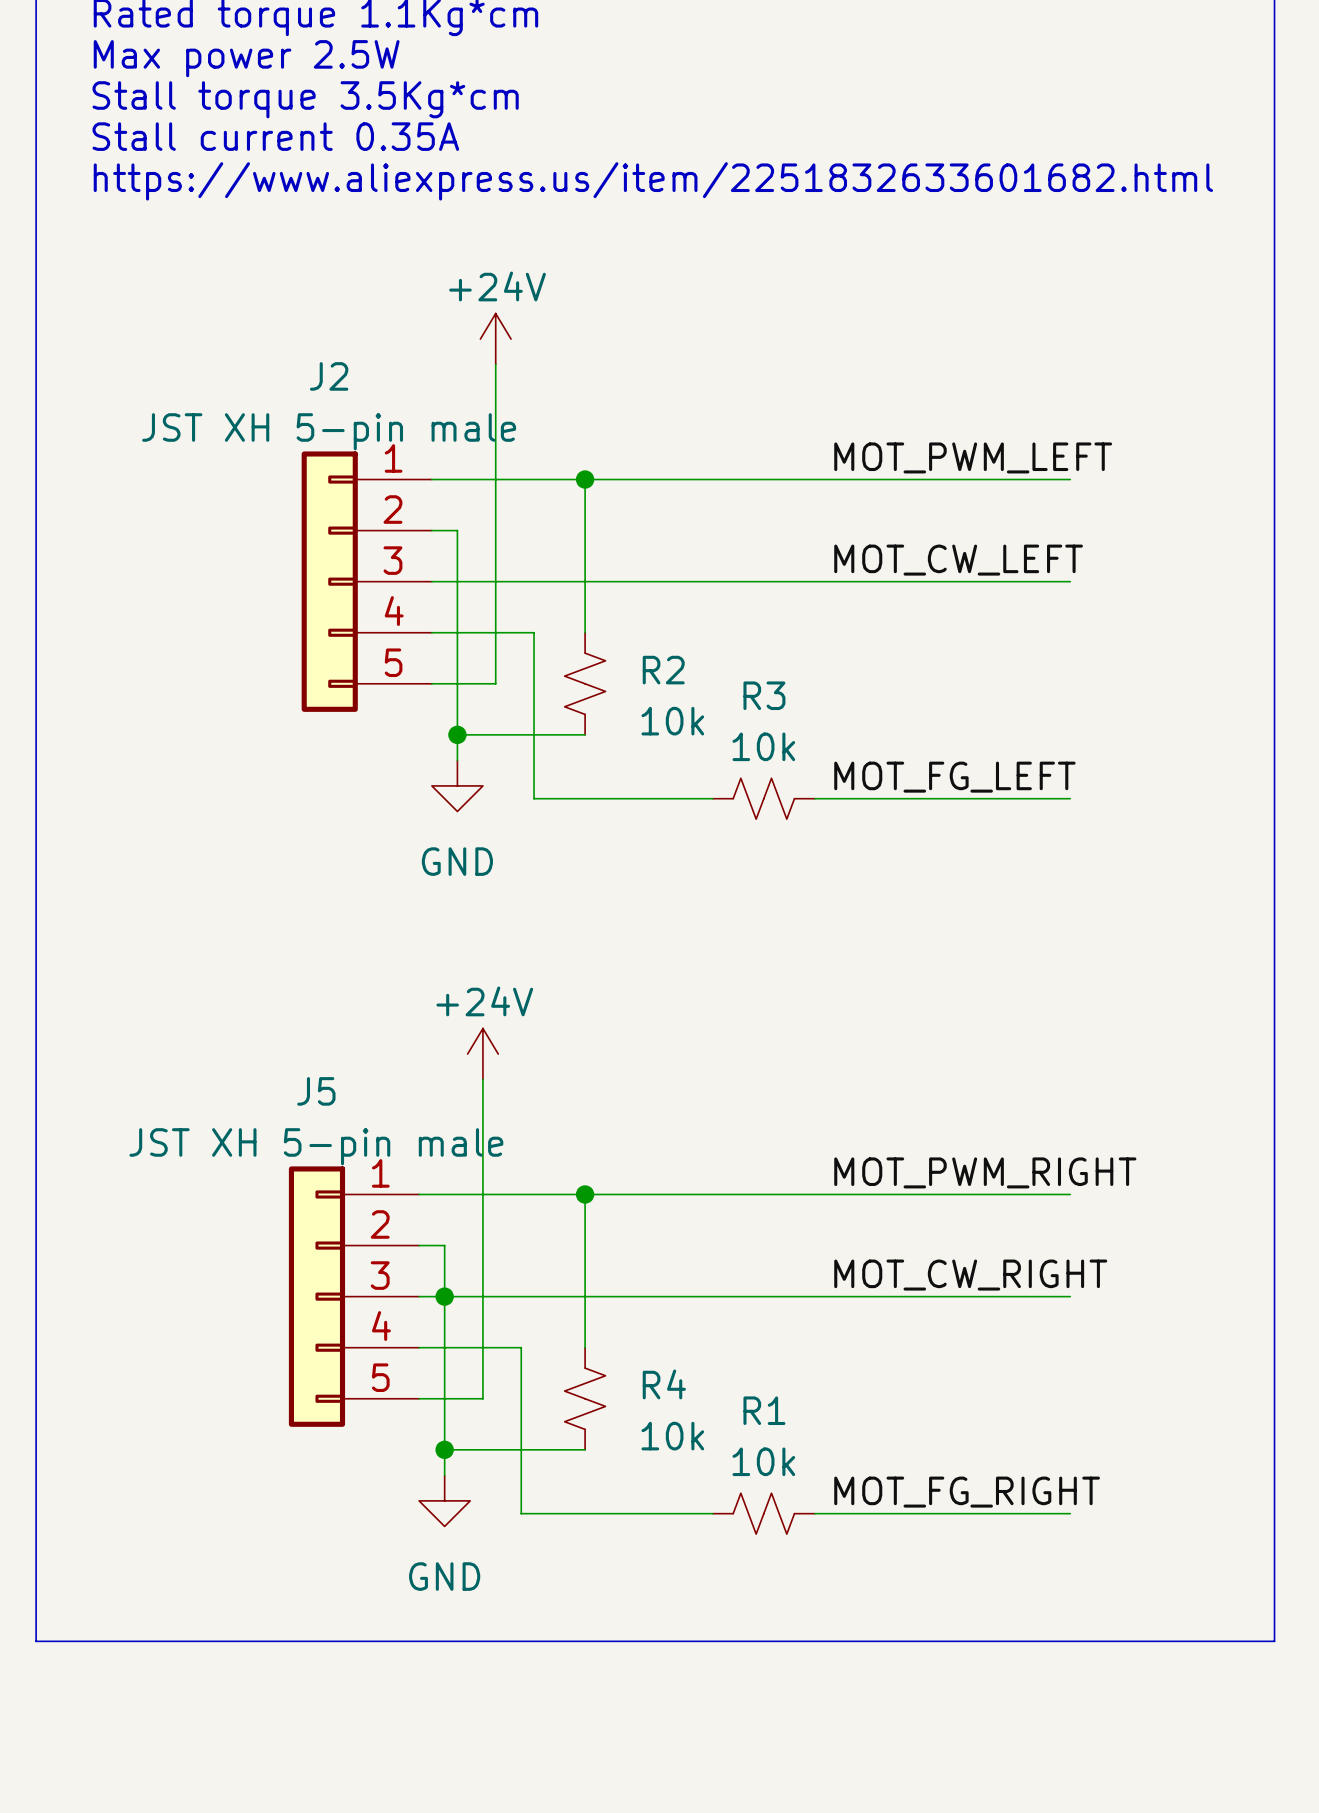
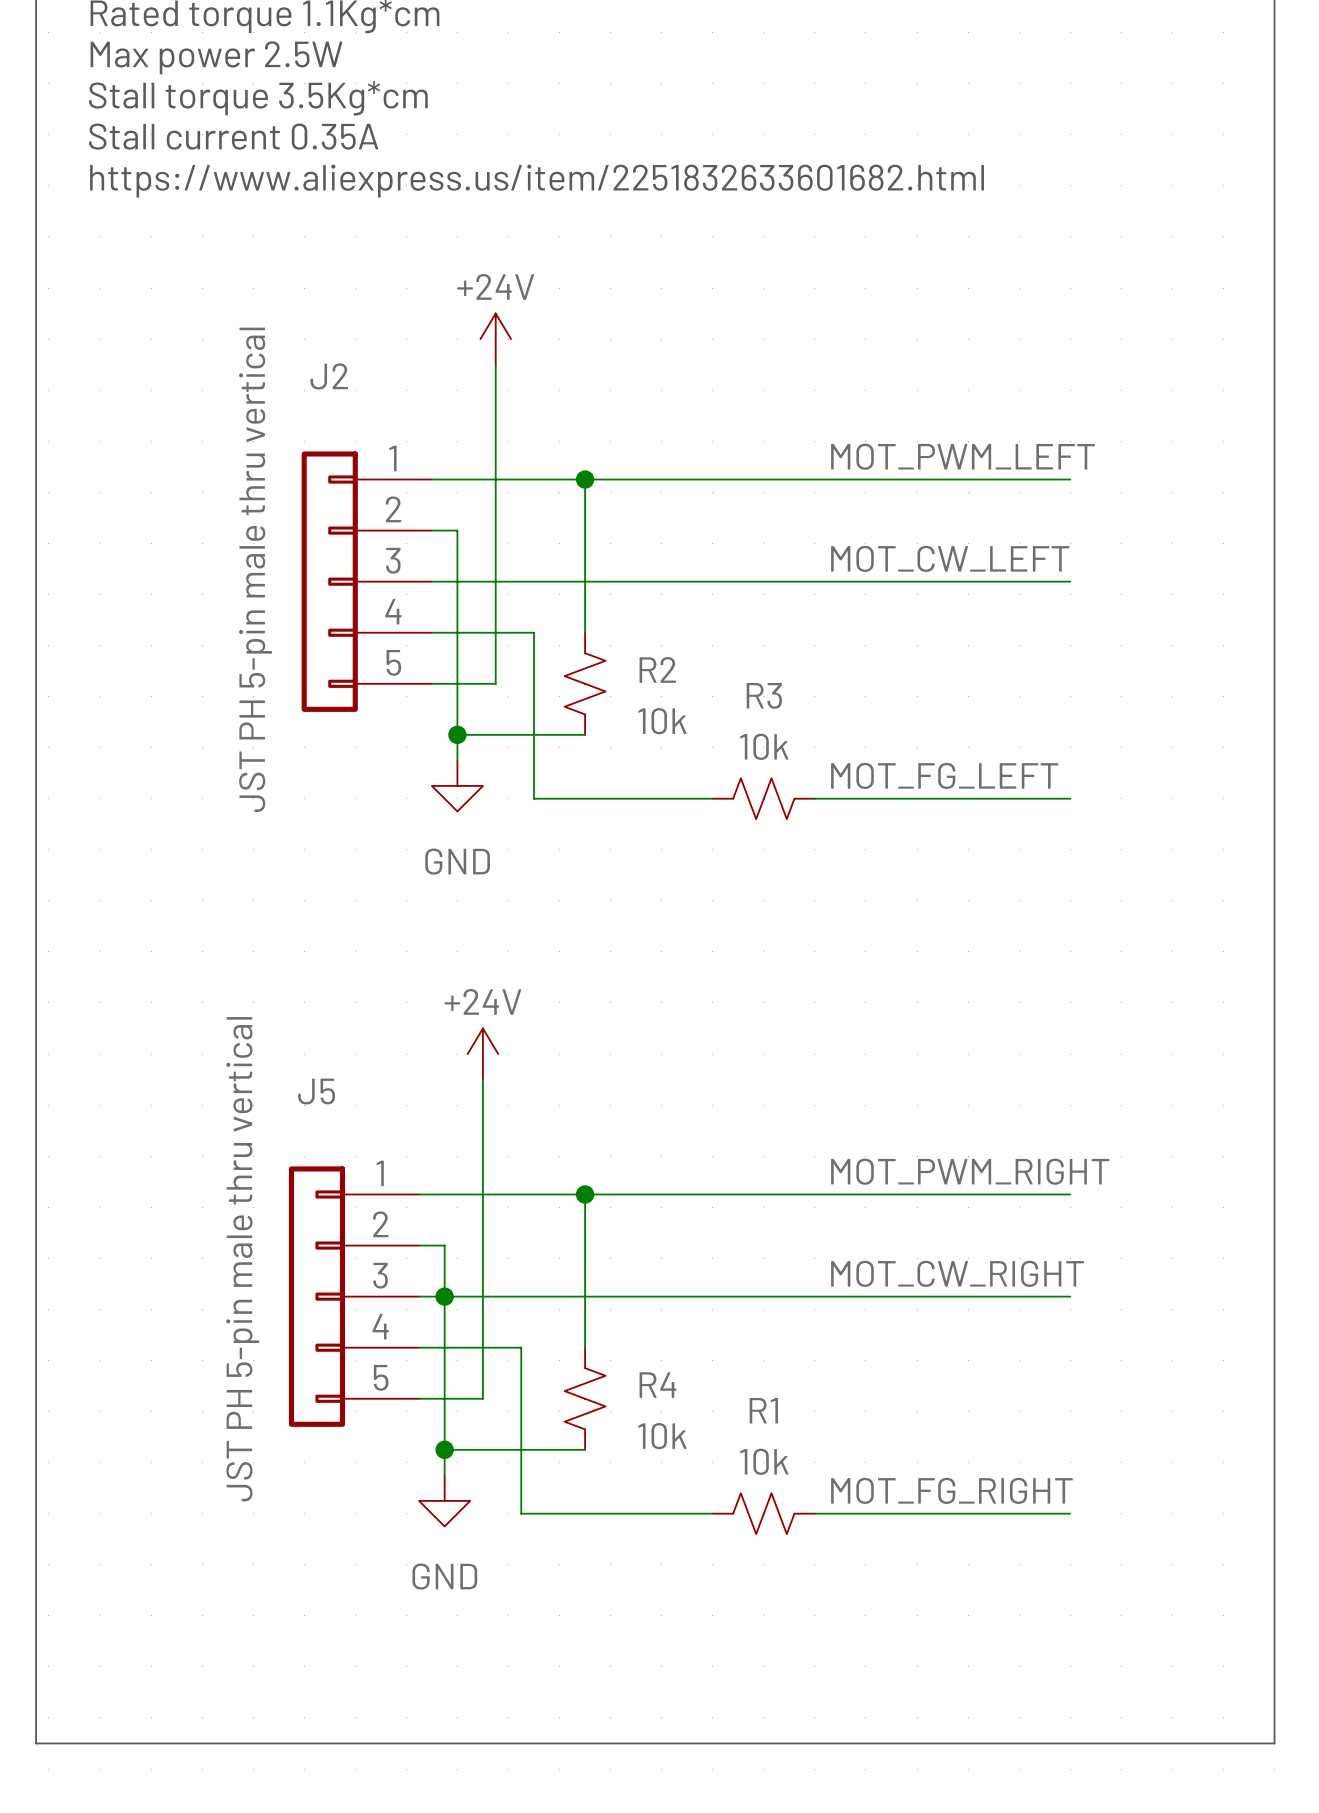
J2 value: JST XH 5-pin male (329, 431) -> JST PH 5-pin male thru vertical (255, 569)
J5 value: JST XH 5-pin male (316, 1146) -> JST PH 5-pin male thru vertical (242, 1259)
line: (36, 1641) (1274, 1641) -> (36, 1641) (36, 1743) (1274, 1743) (1274, 1641)

